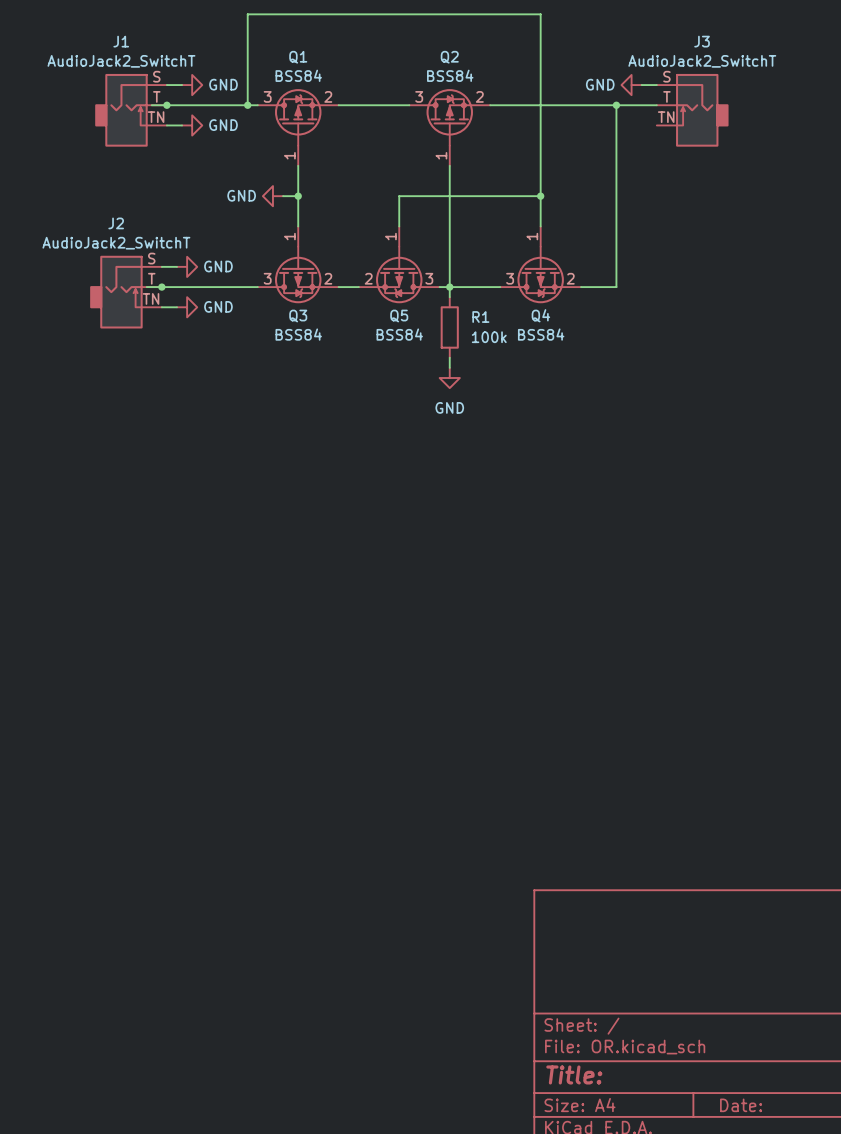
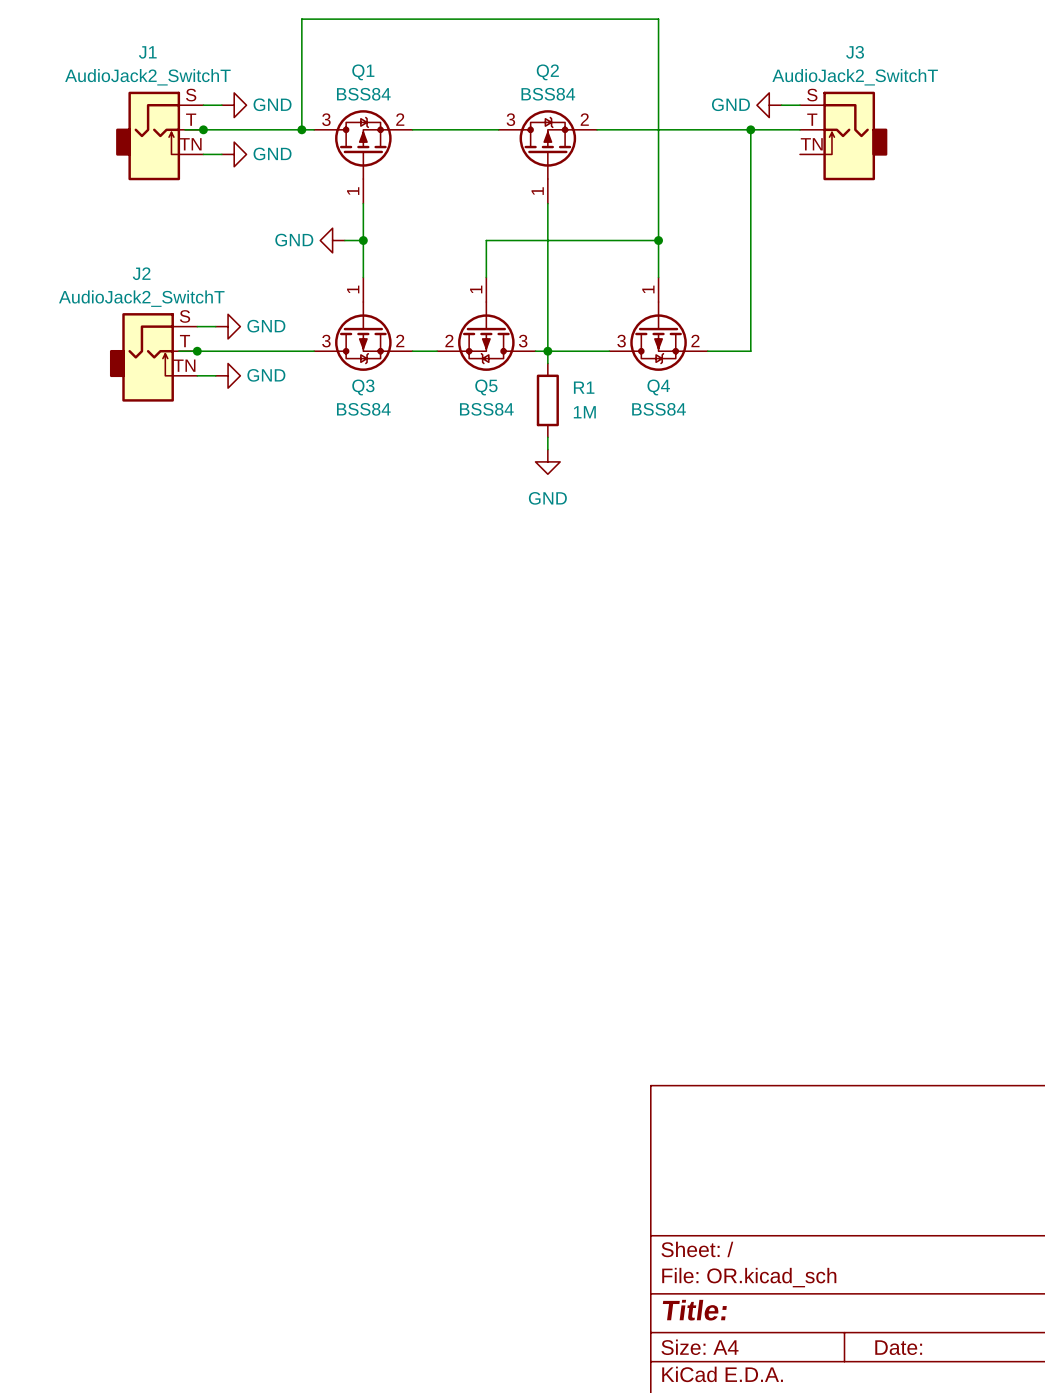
R1 value: 100k (489, 337) -> 1M (584, 412)

